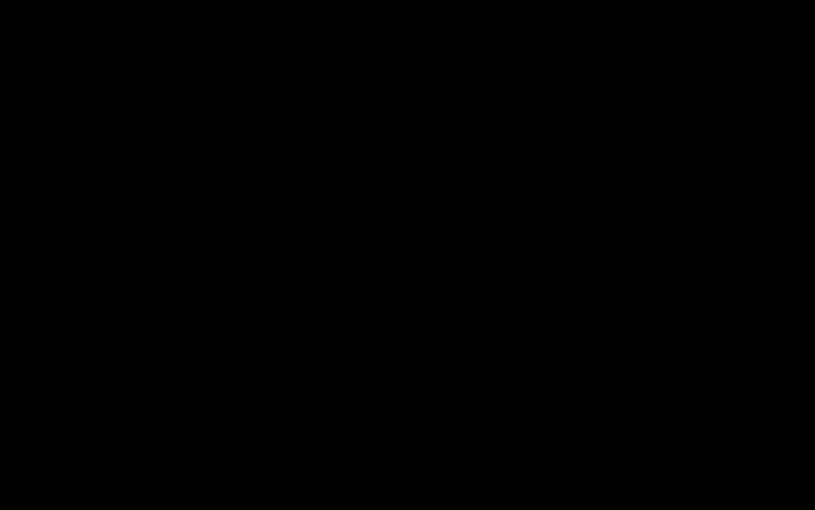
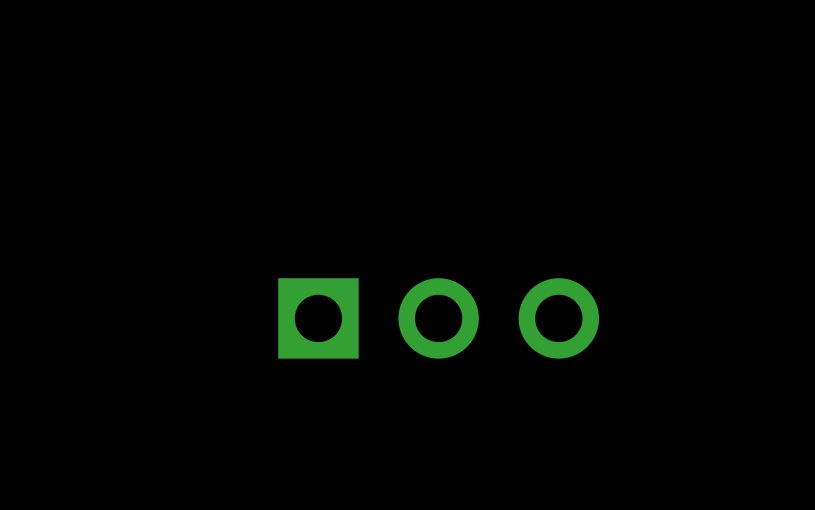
part: none -> (438, 318)

